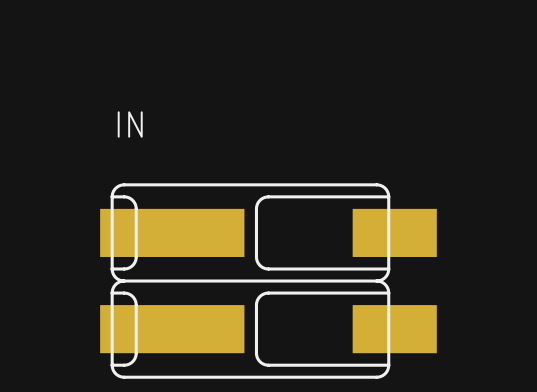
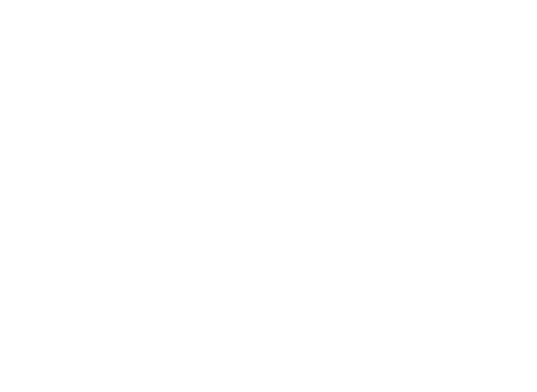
IN: (268, 281) -> none

